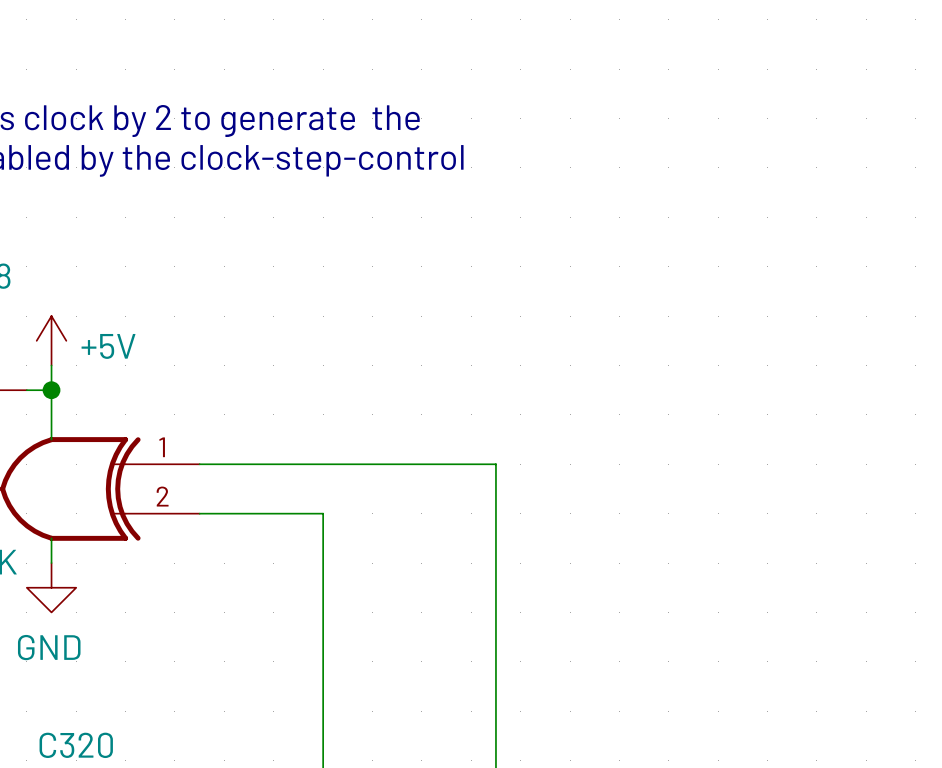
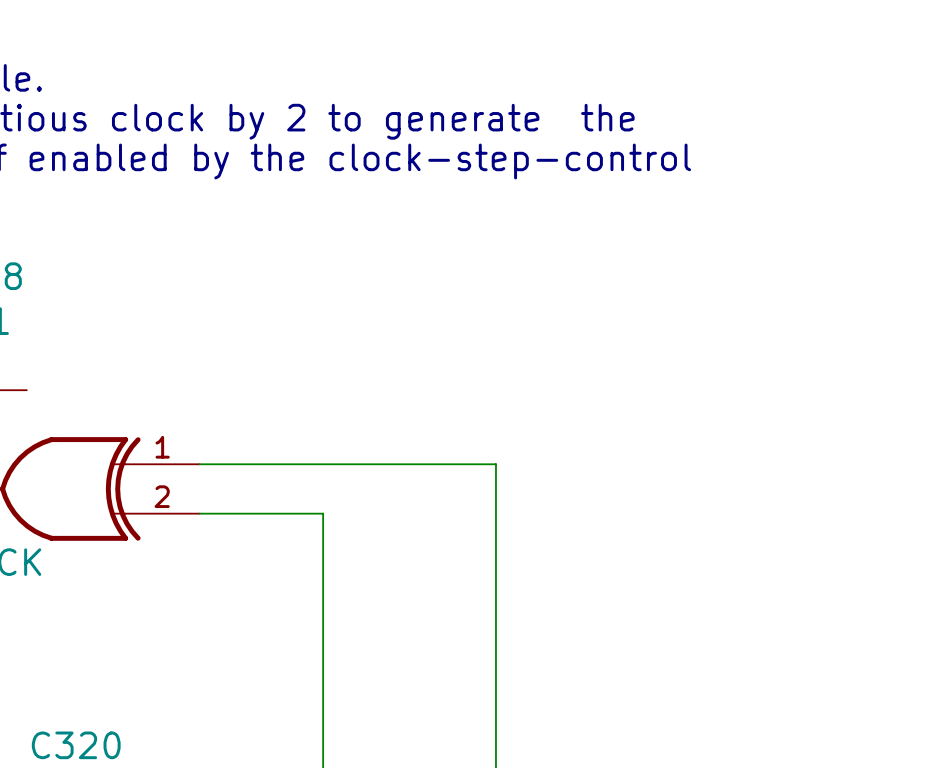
power symbol: +5V (51, 340) -> none
wire: (51, 365) (51, 439) -> none
wire: (26, 390) (51, 390) -> none
junction: (51, 390) -> none
wire: (51, 538) (51, 563) -> none
power symbol: GND (51, 587) -> none

